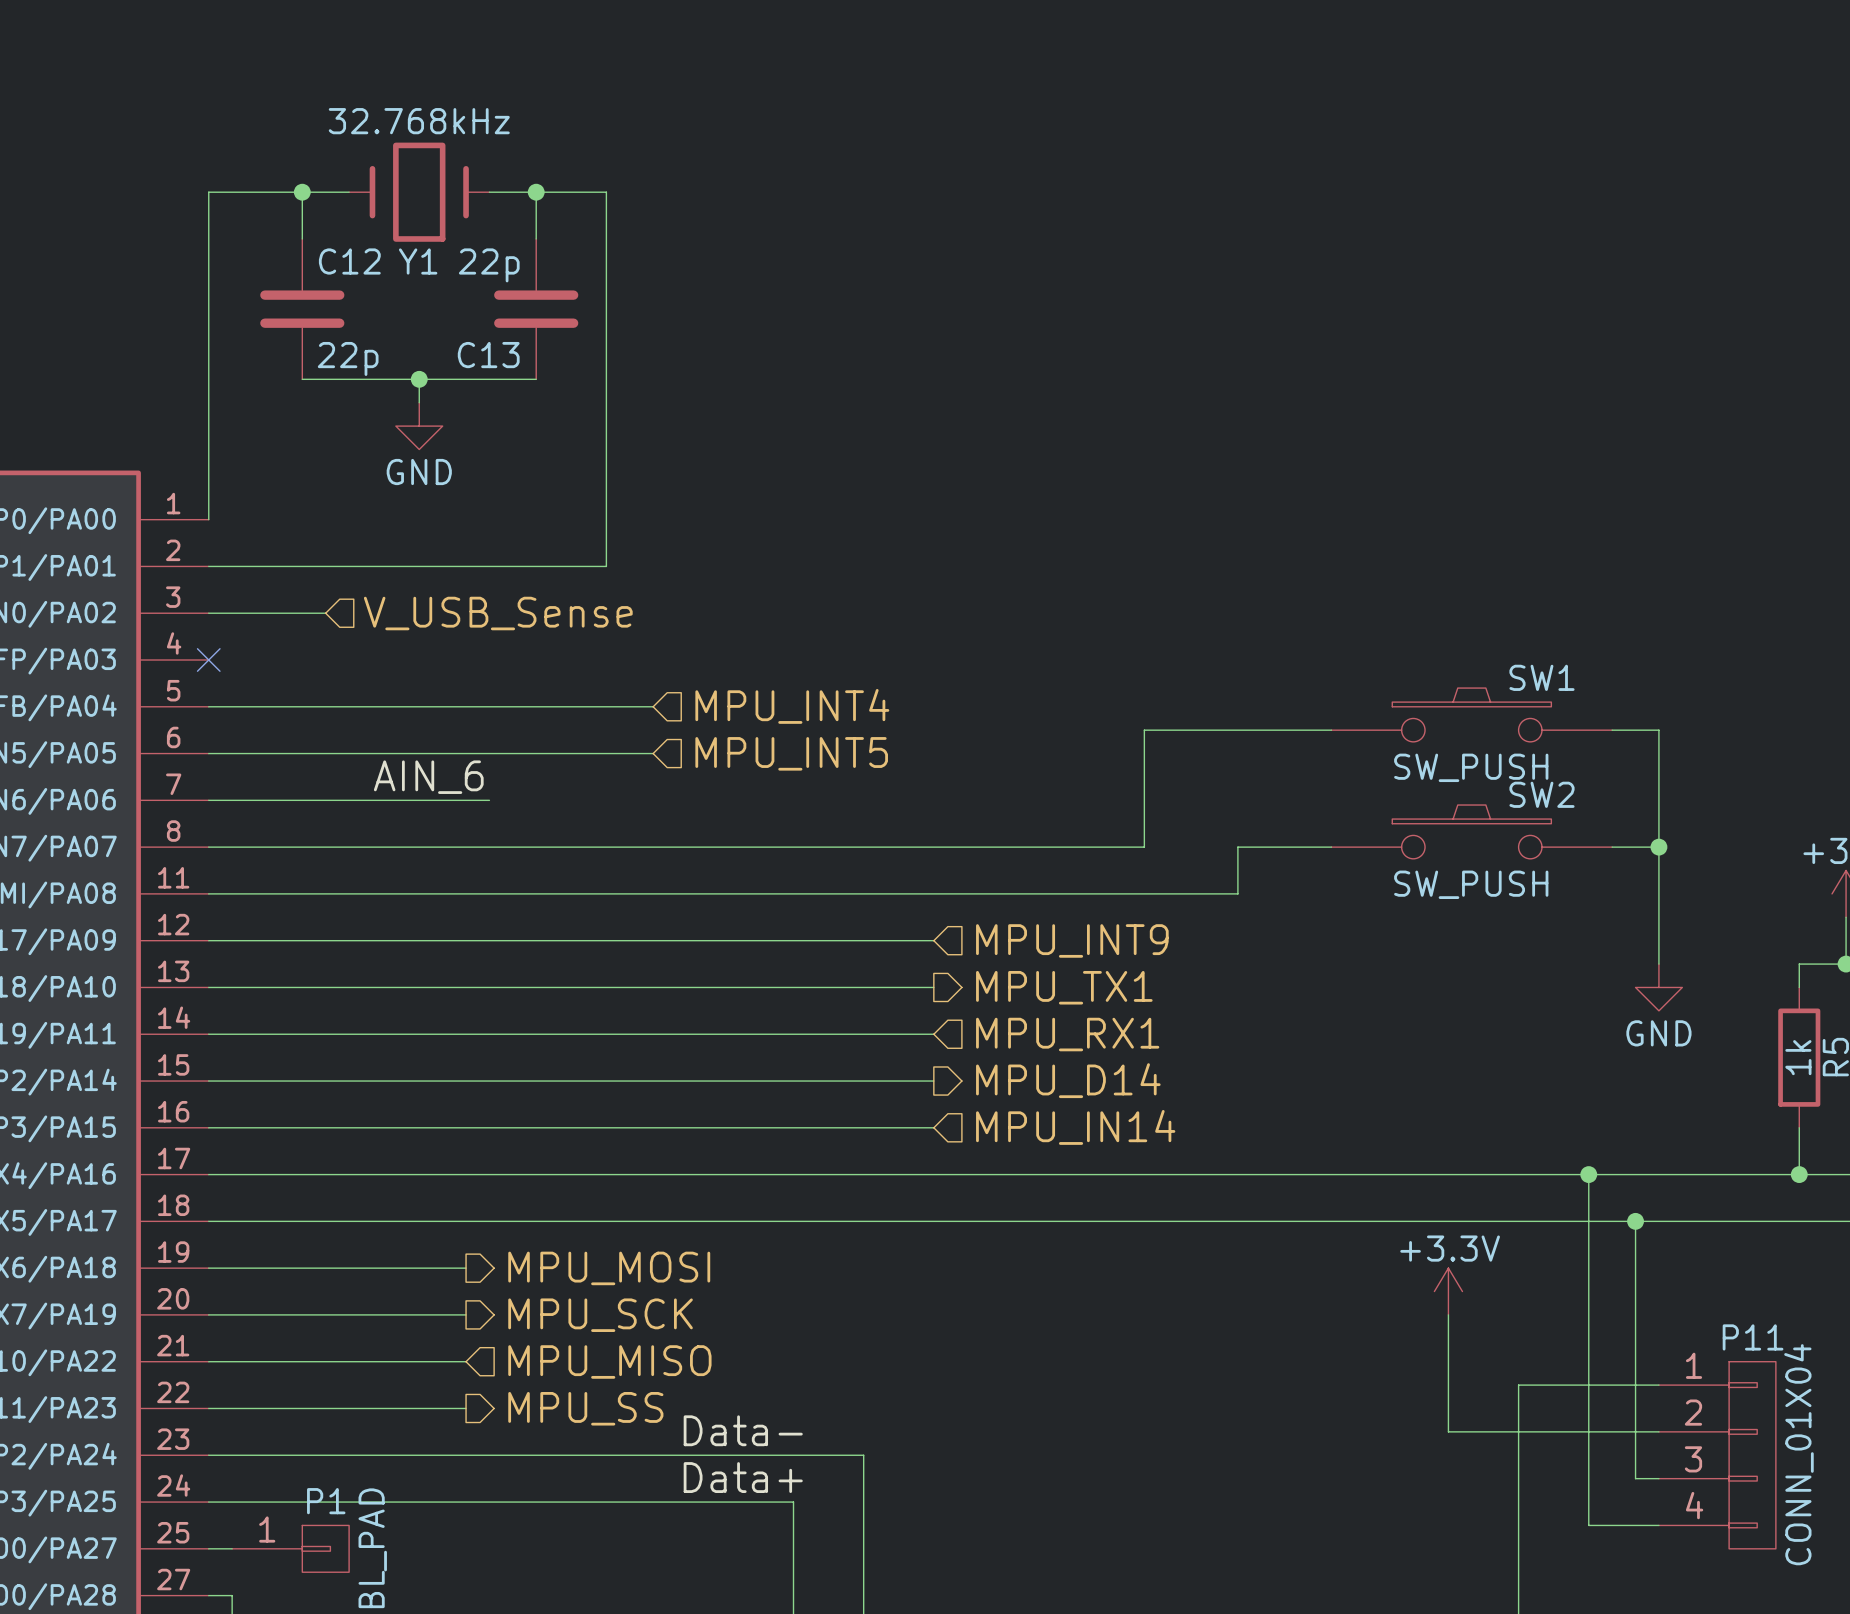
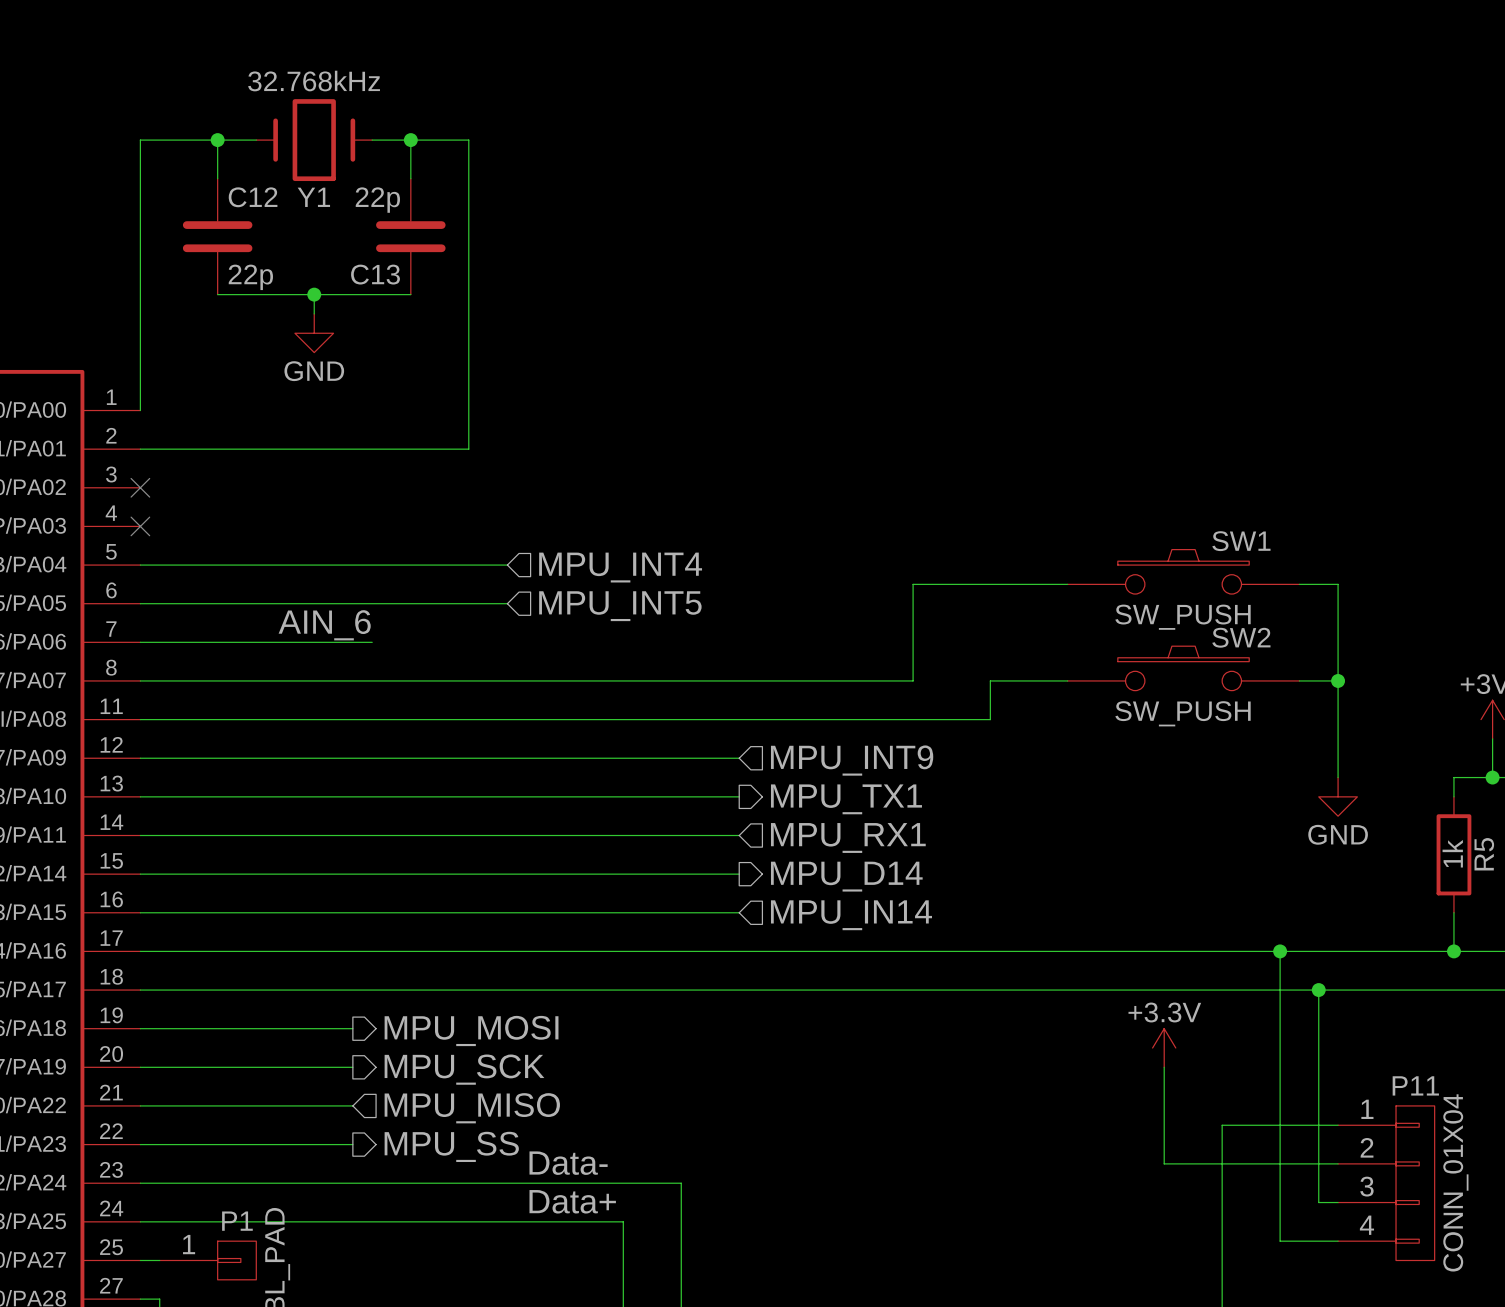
wire: (208, 613) (325, 613) -> none
no-connect mark: none -> (140, 487)
hierarchical label: V_USB_Sense (498, 613) -> none

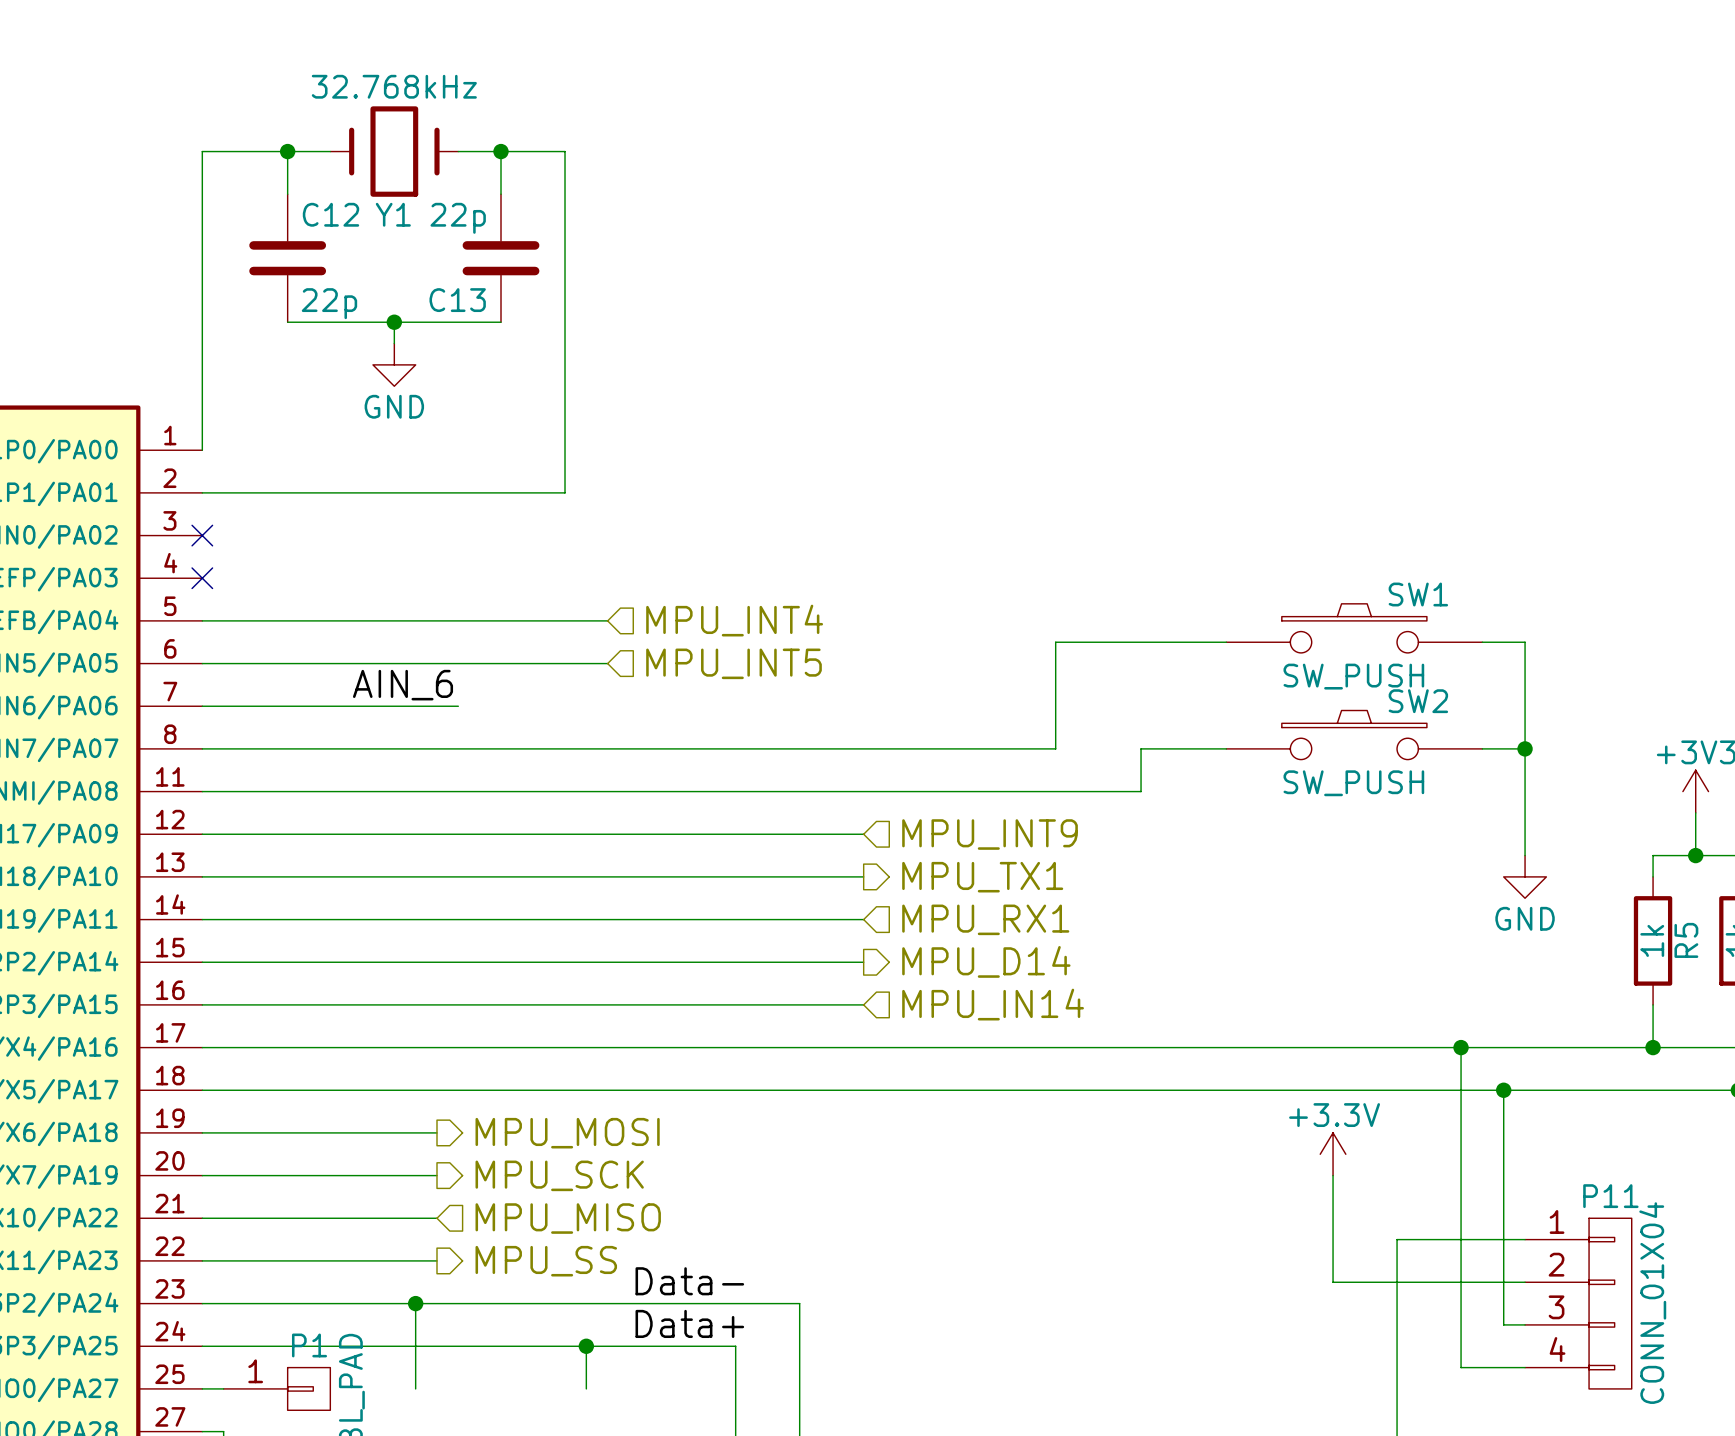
wire: none -> (415, 1303) (415, 1388)
junction: none -> (415, 1303)
wire: none -> (586, 1346) (586, 1388)
junction: none -> (586, 1346)

